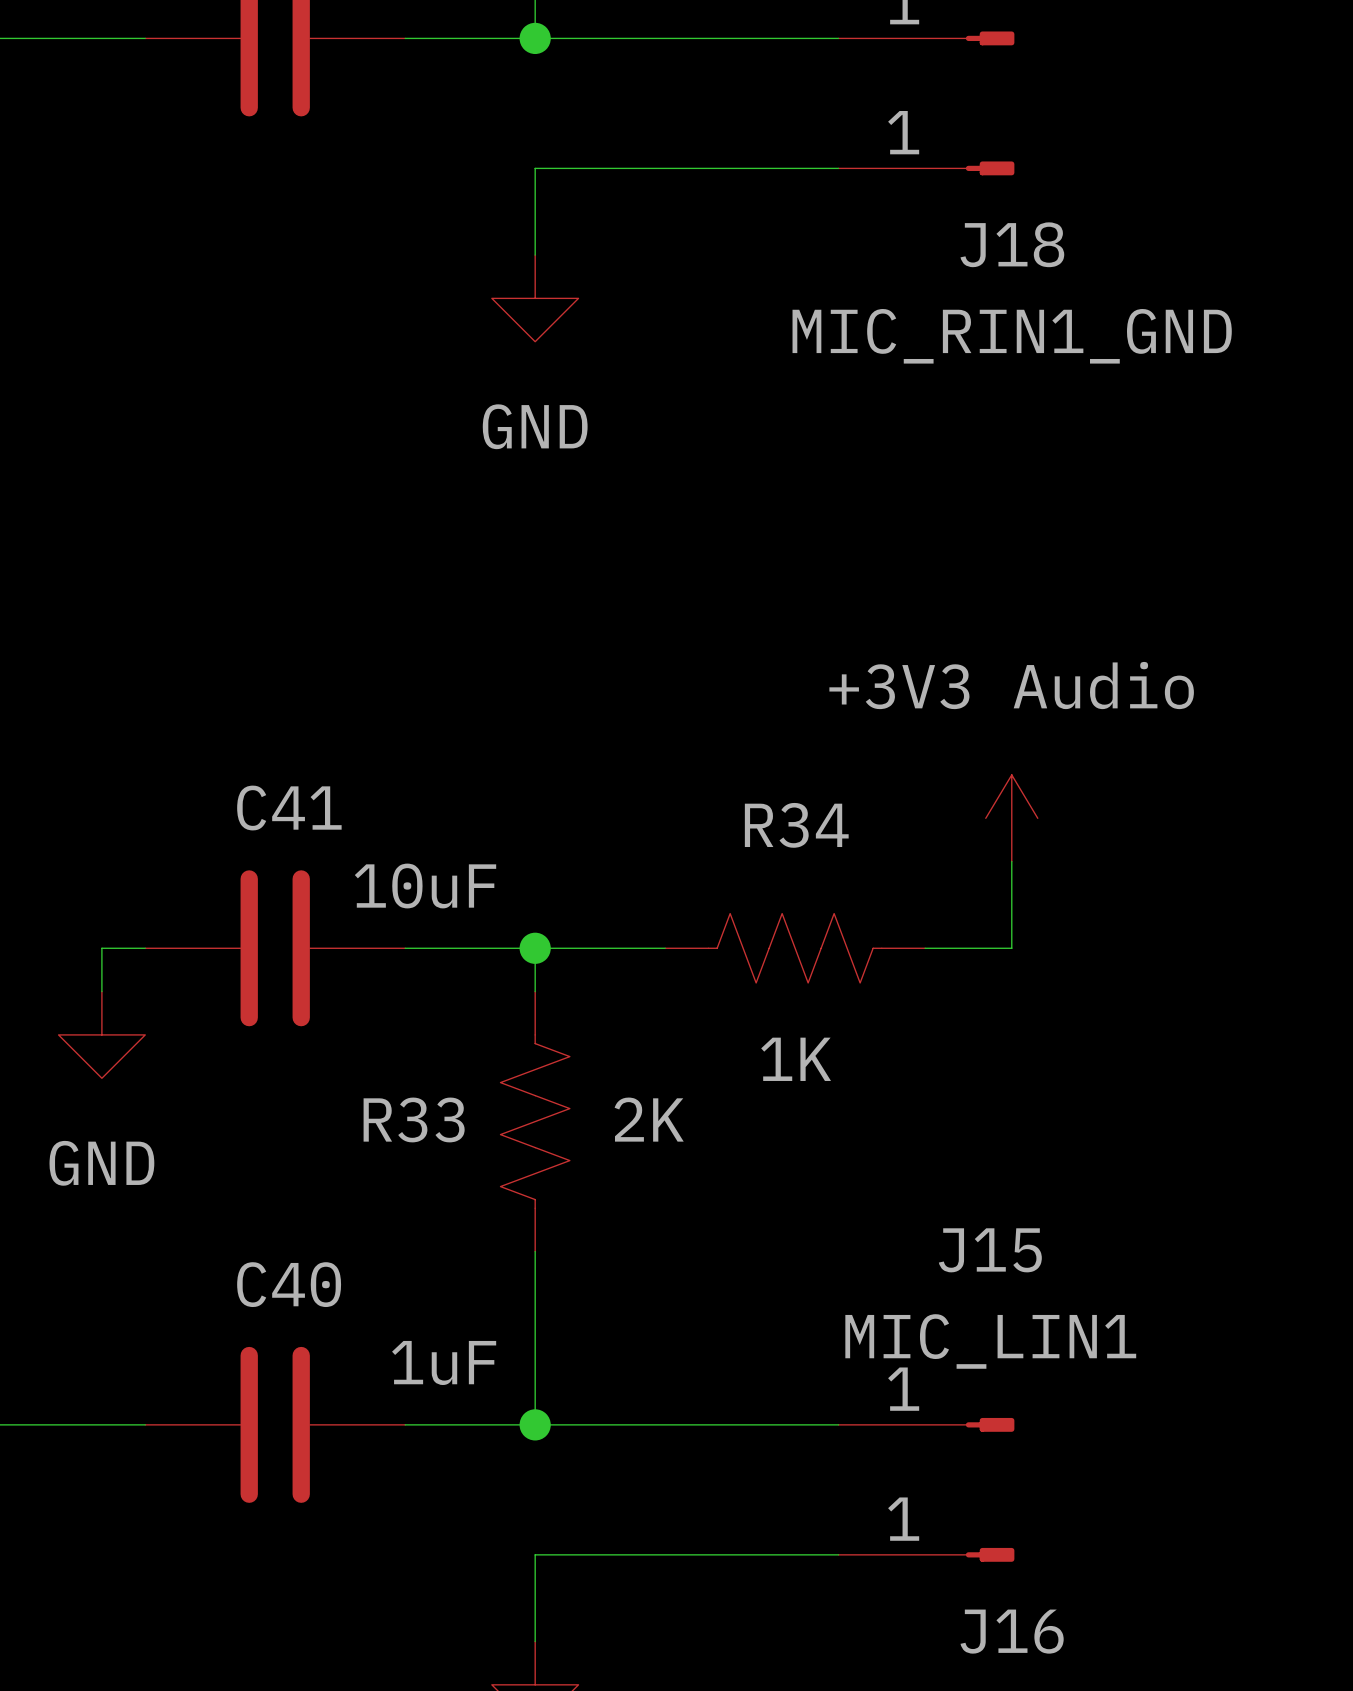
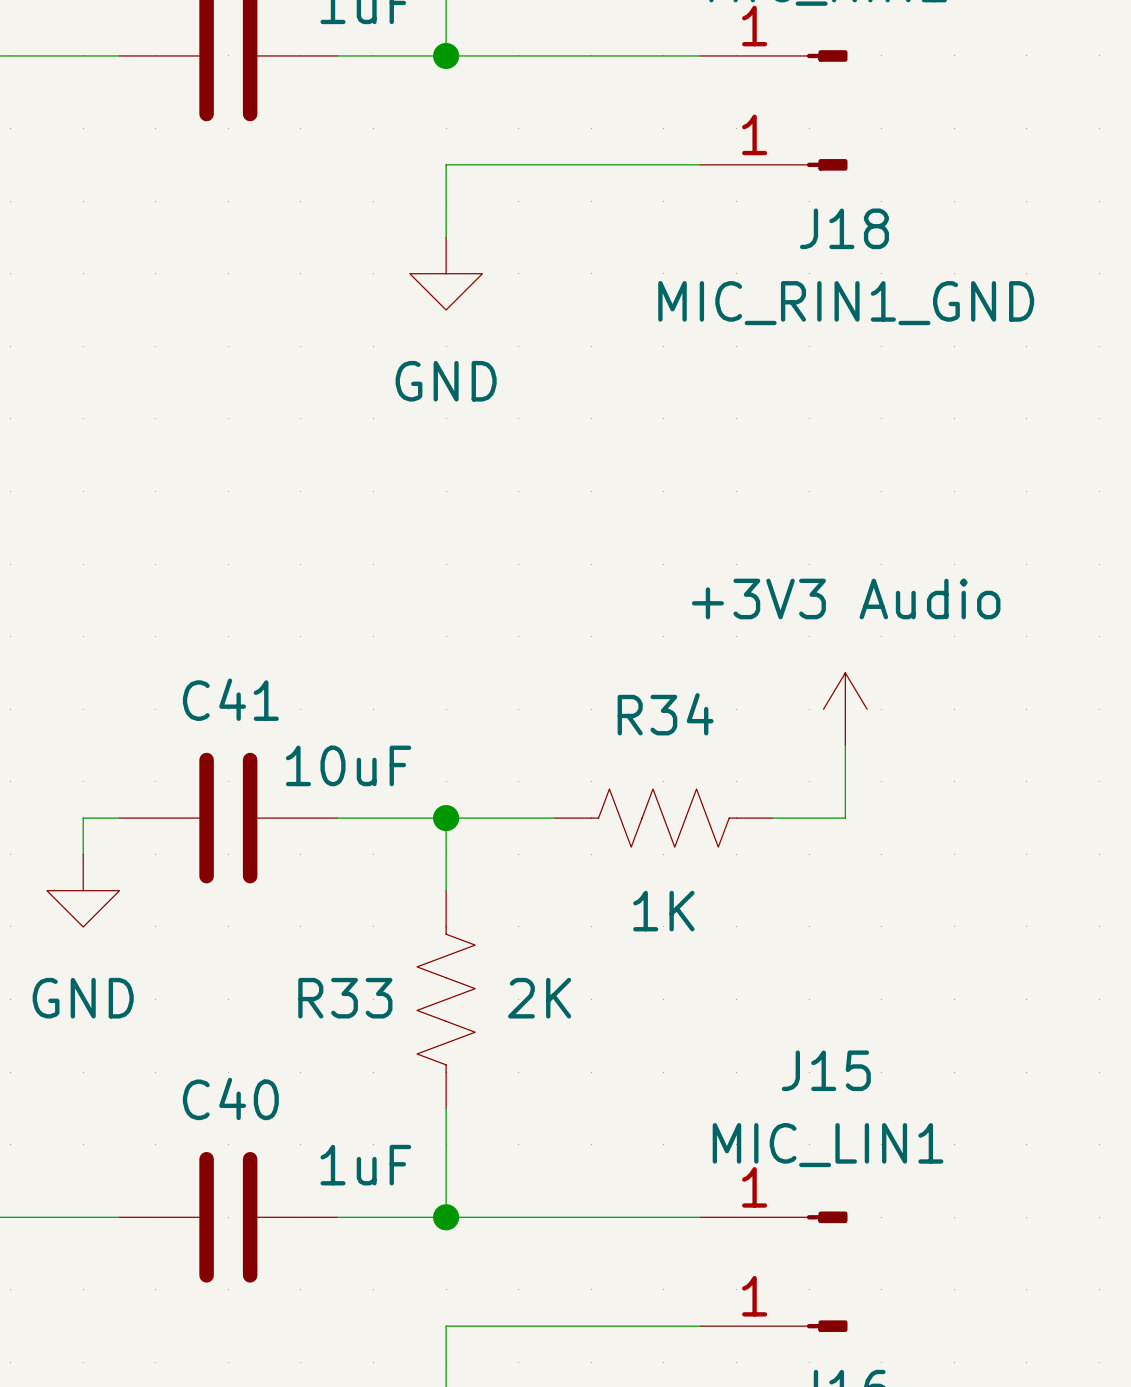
R33 position: (535, 1121) -> (446, 999)

